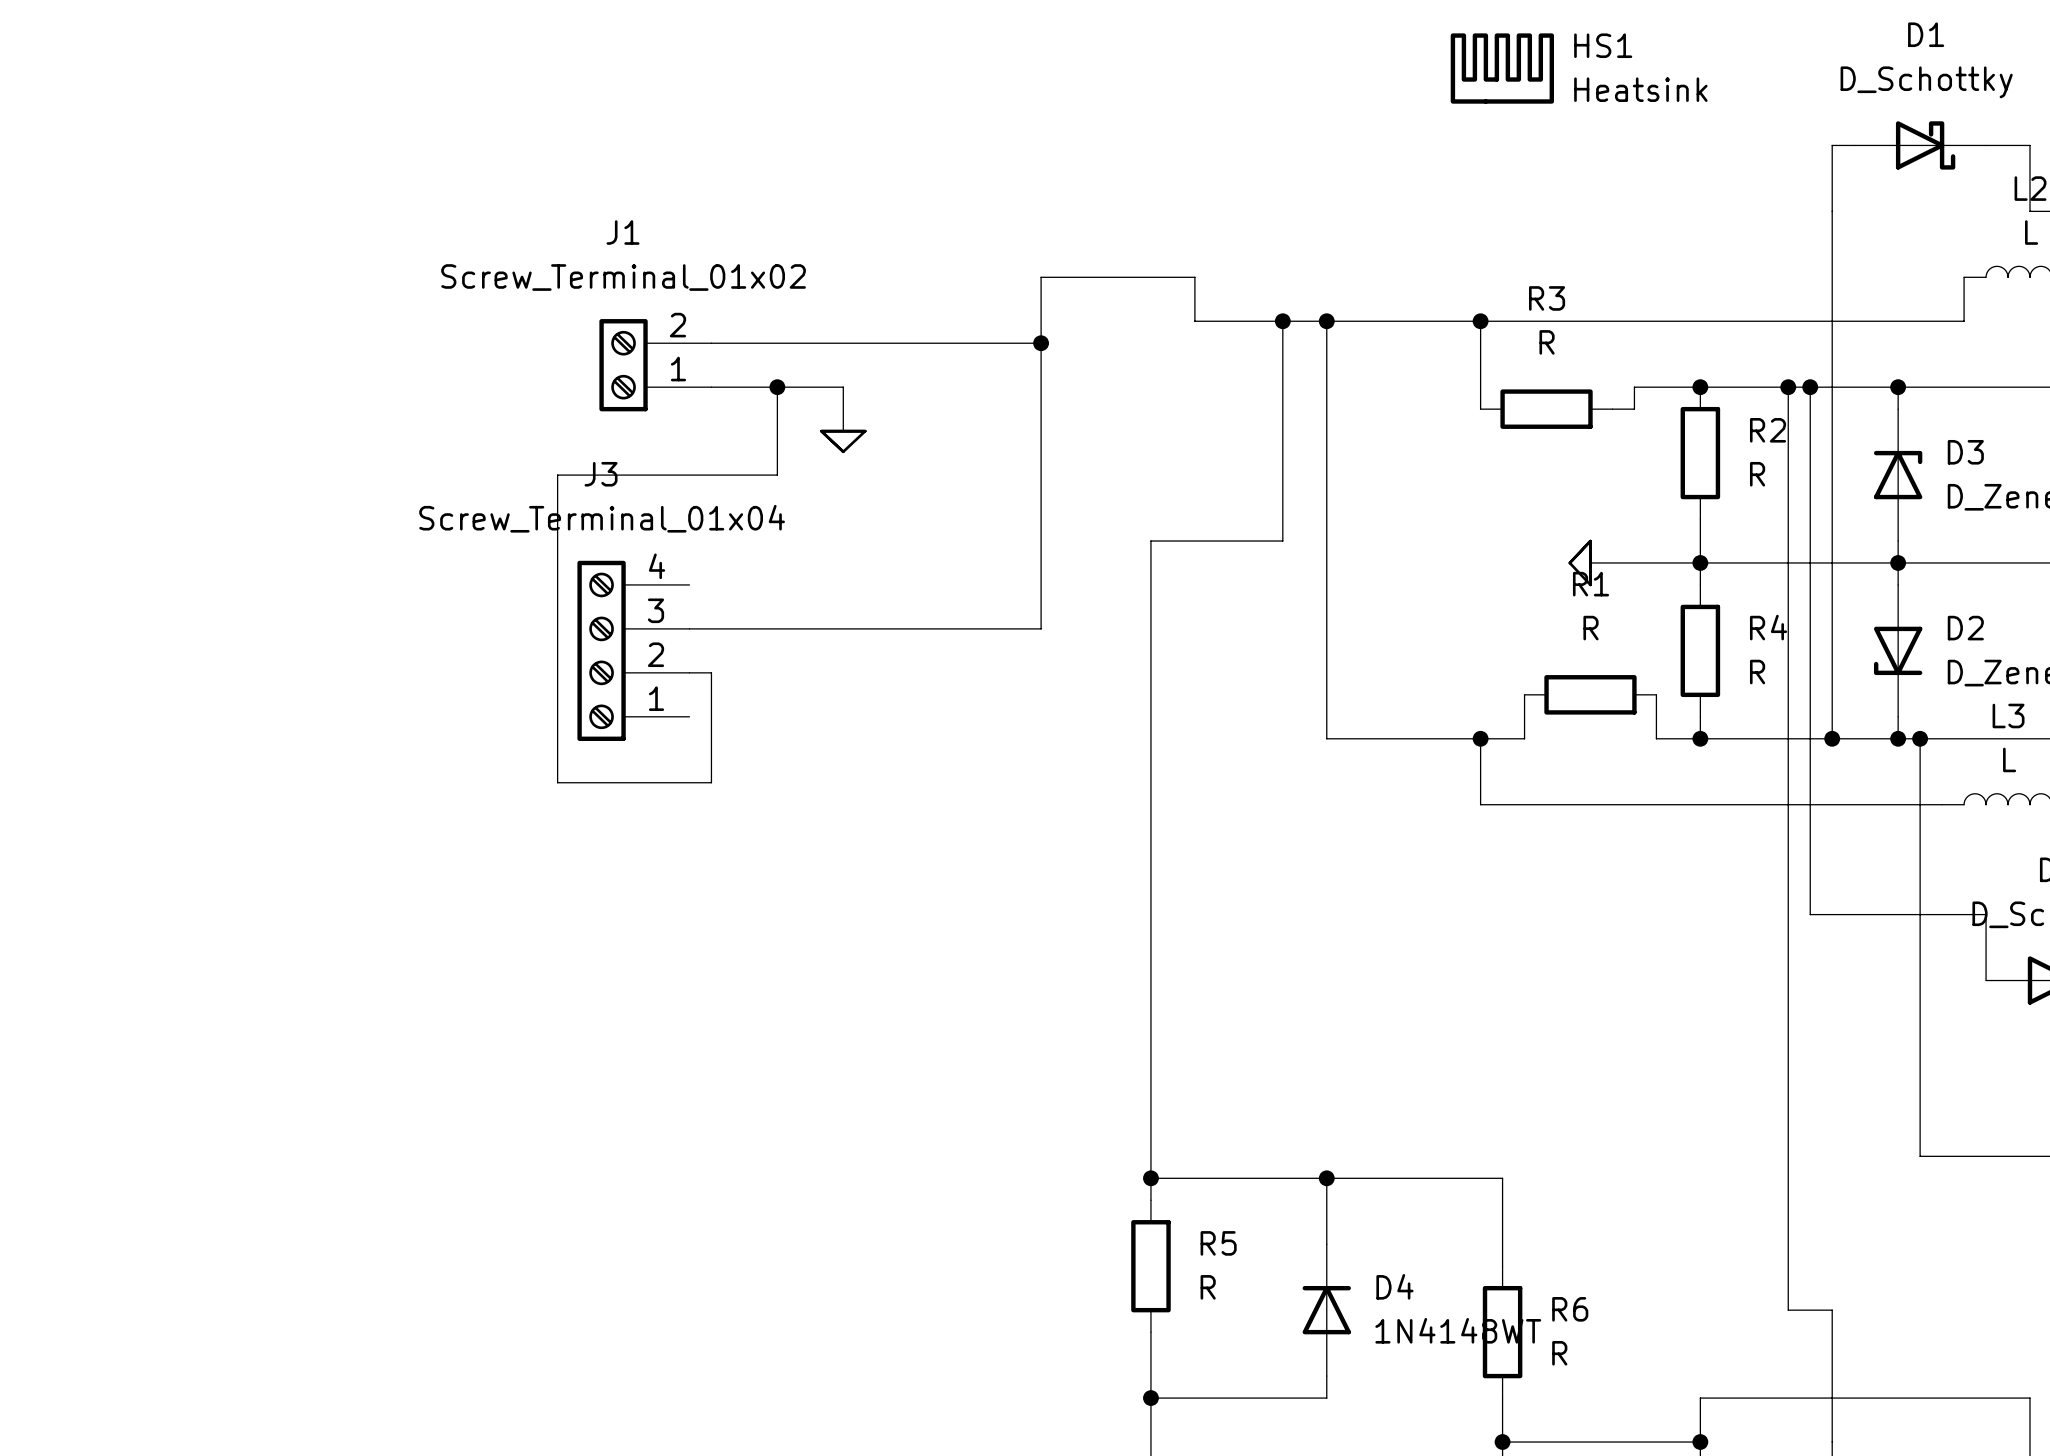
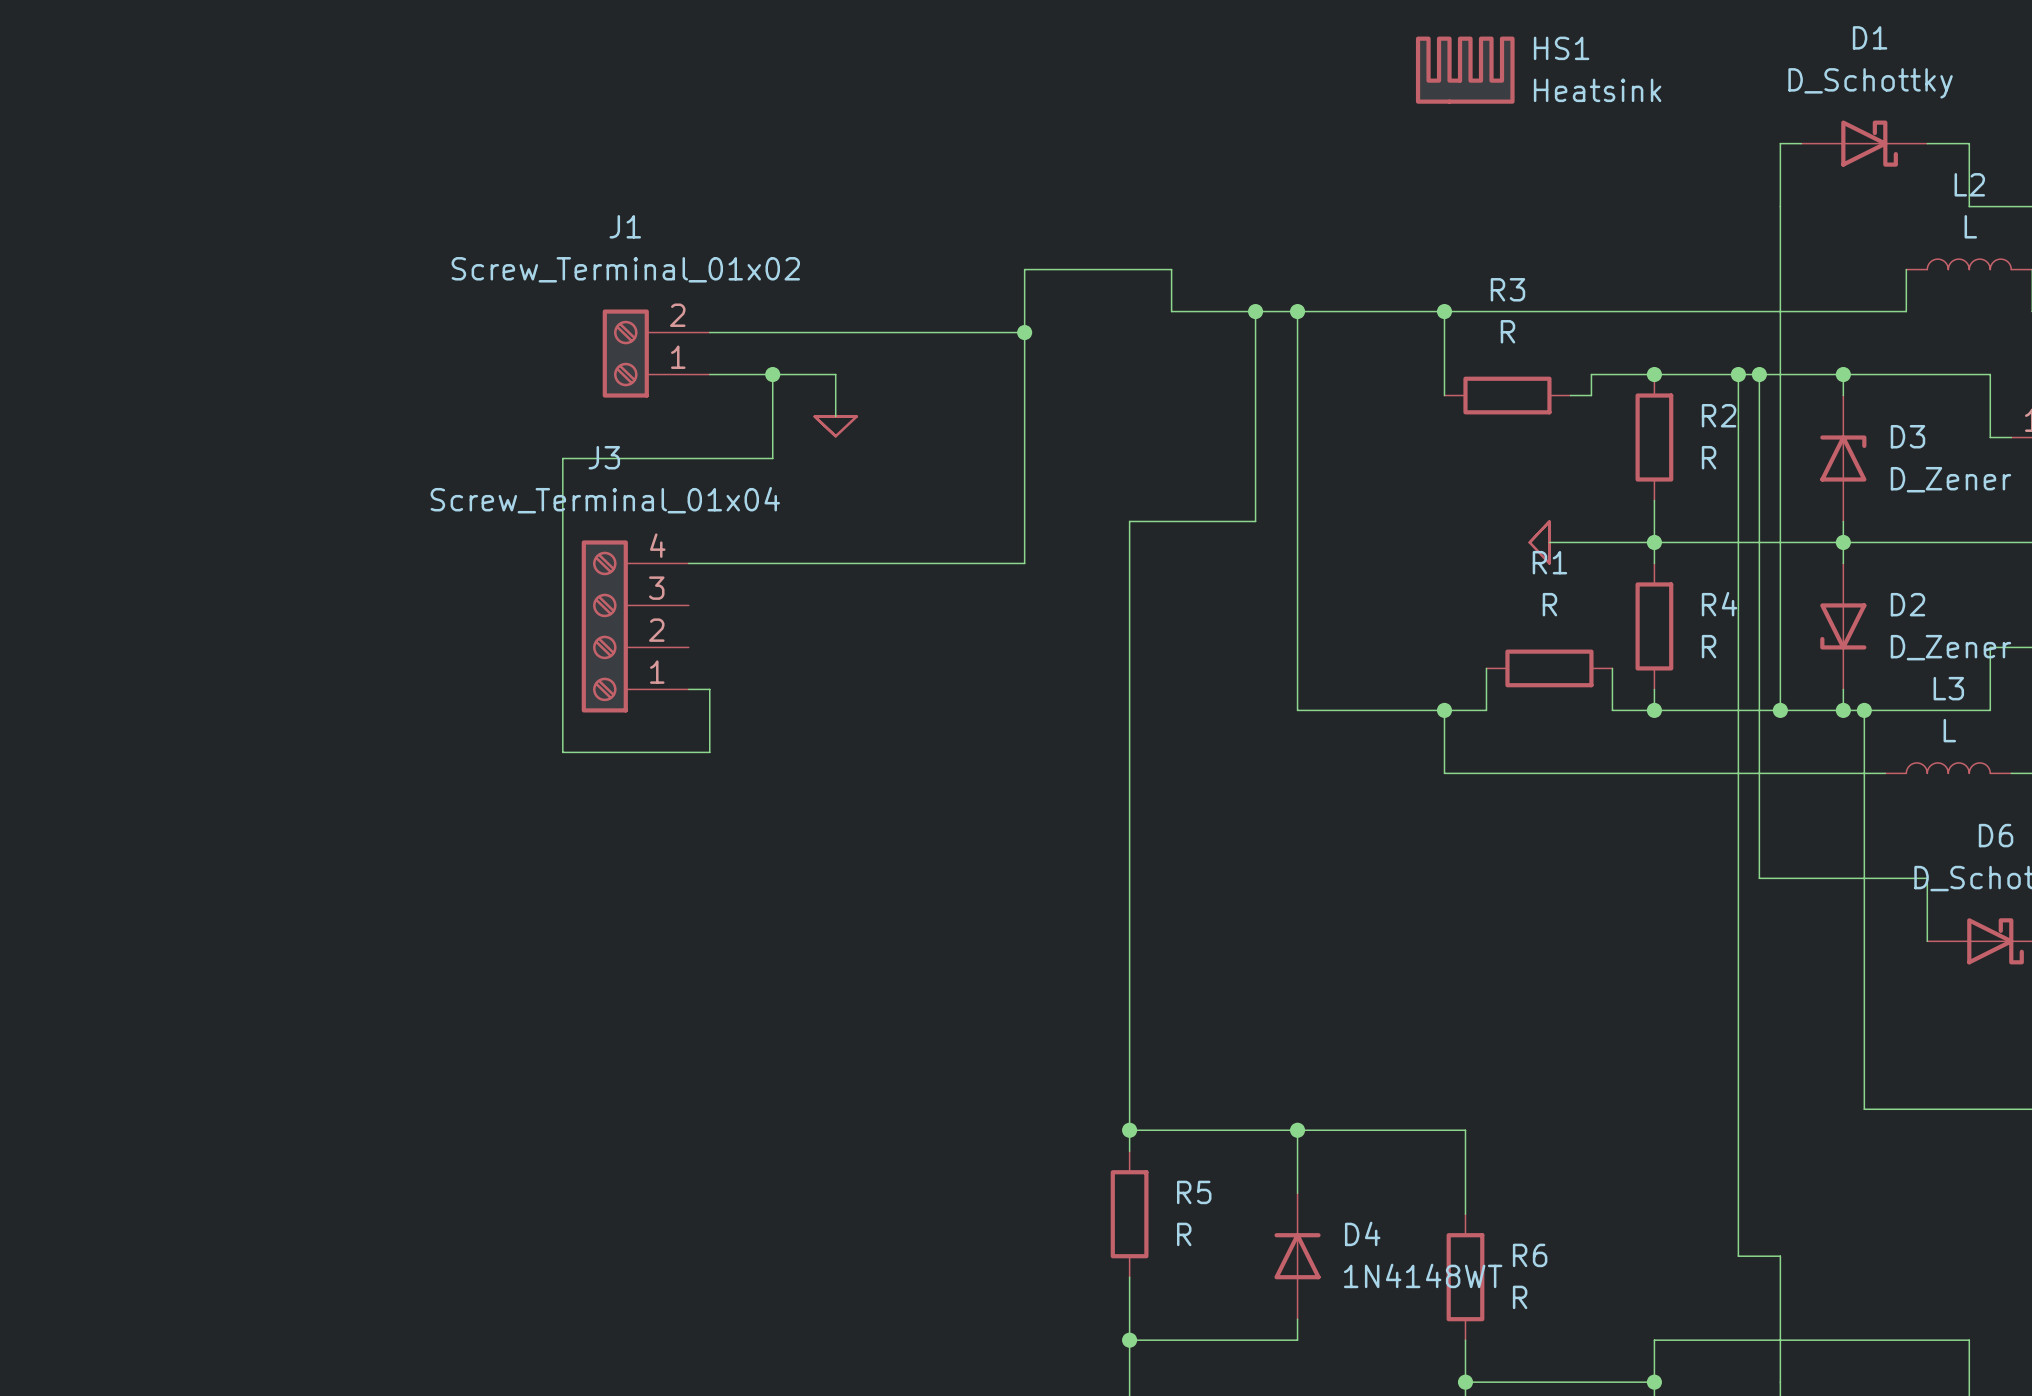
wire: (1041, 584) (1041, 628) (689, 628) -> (1024, 563) (688, 563)
wire: (689, 672) (711, 672) (711, 716) -> (688, 689) (709, 689)

